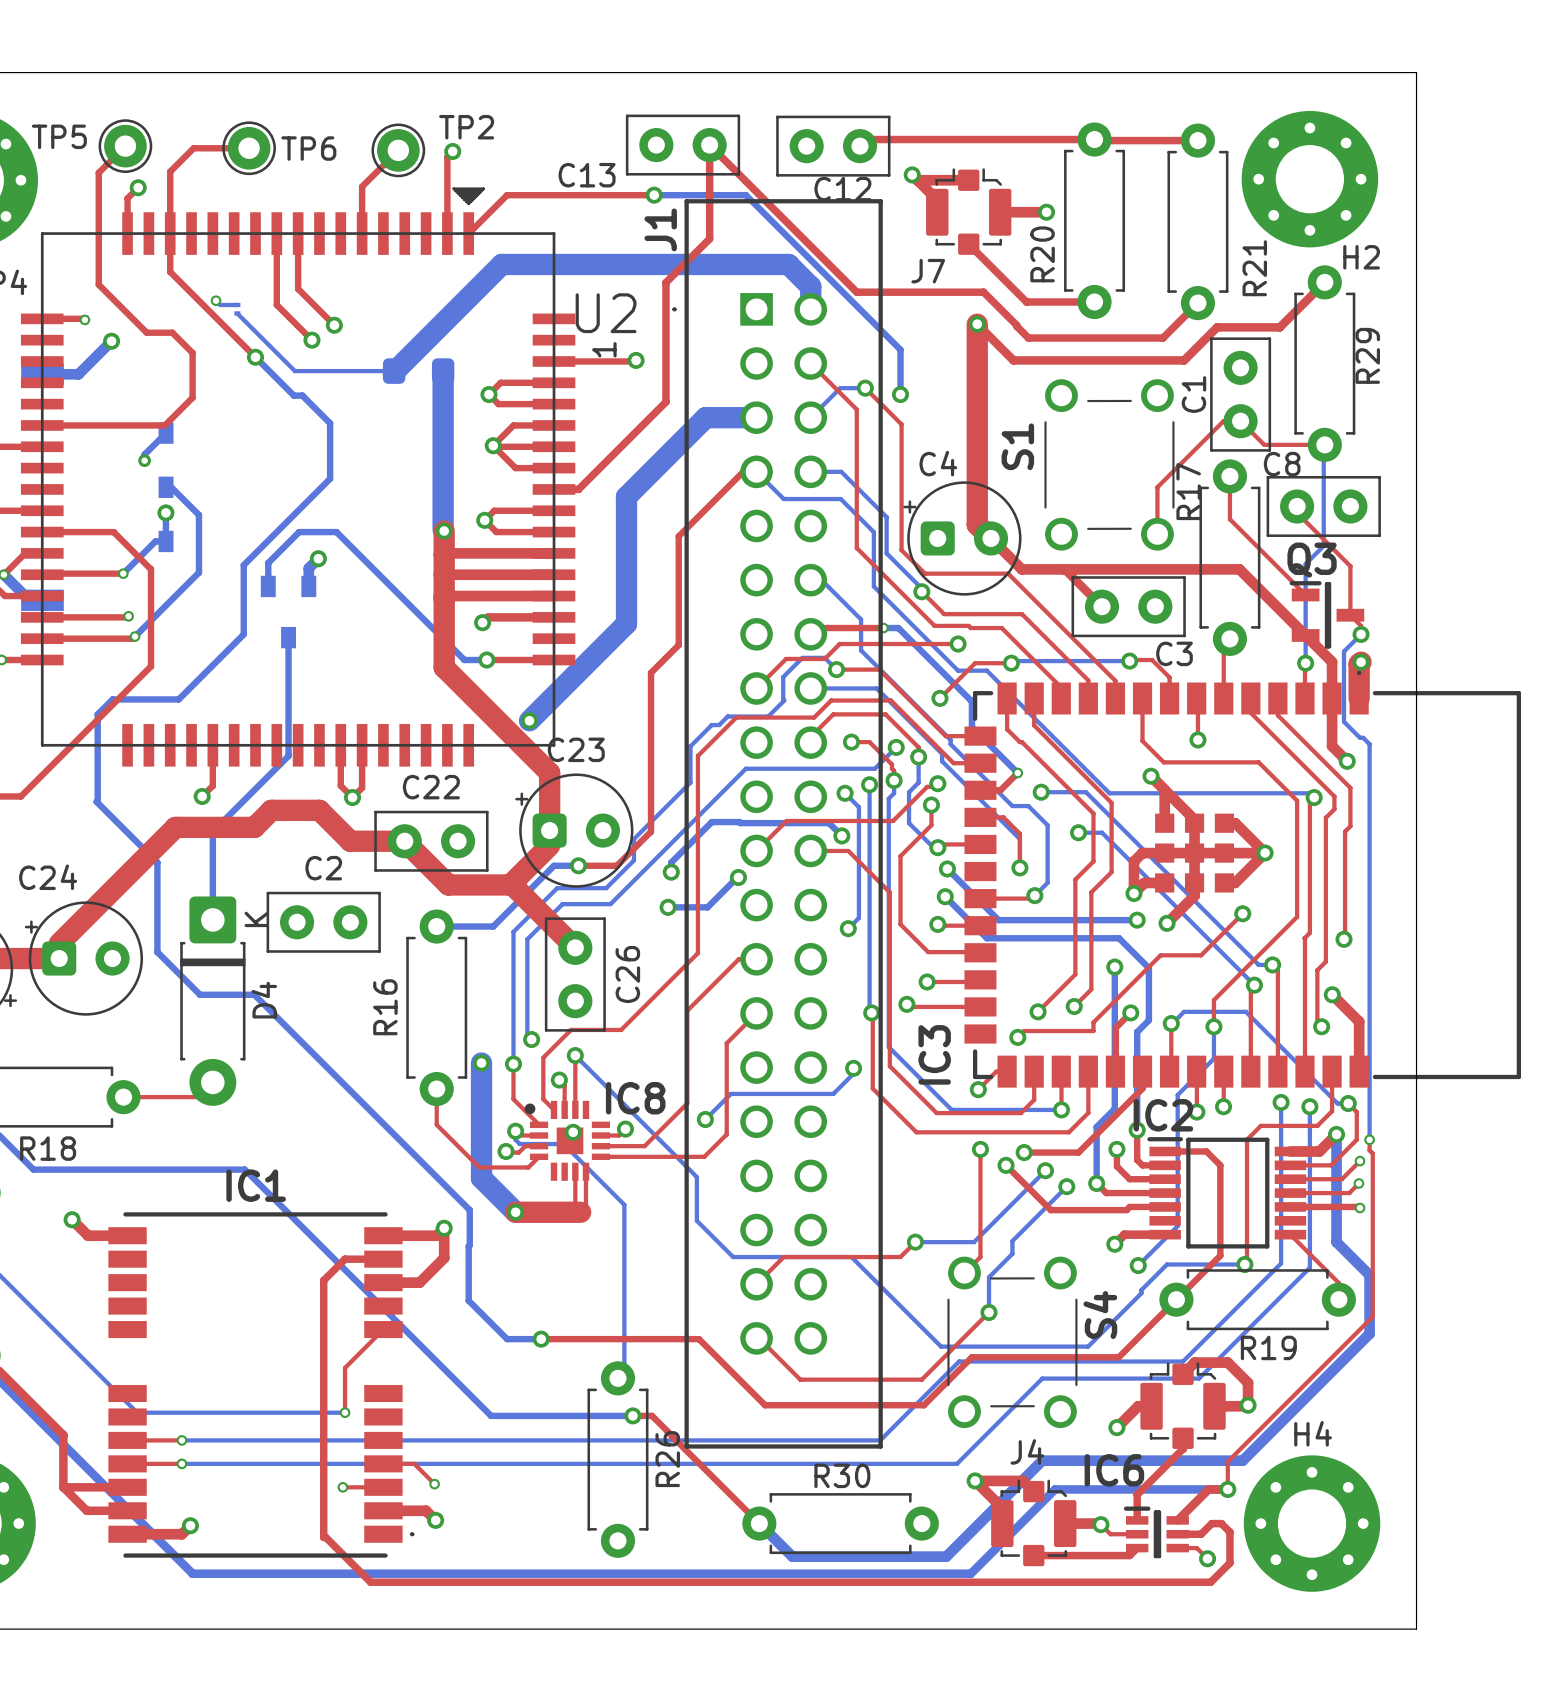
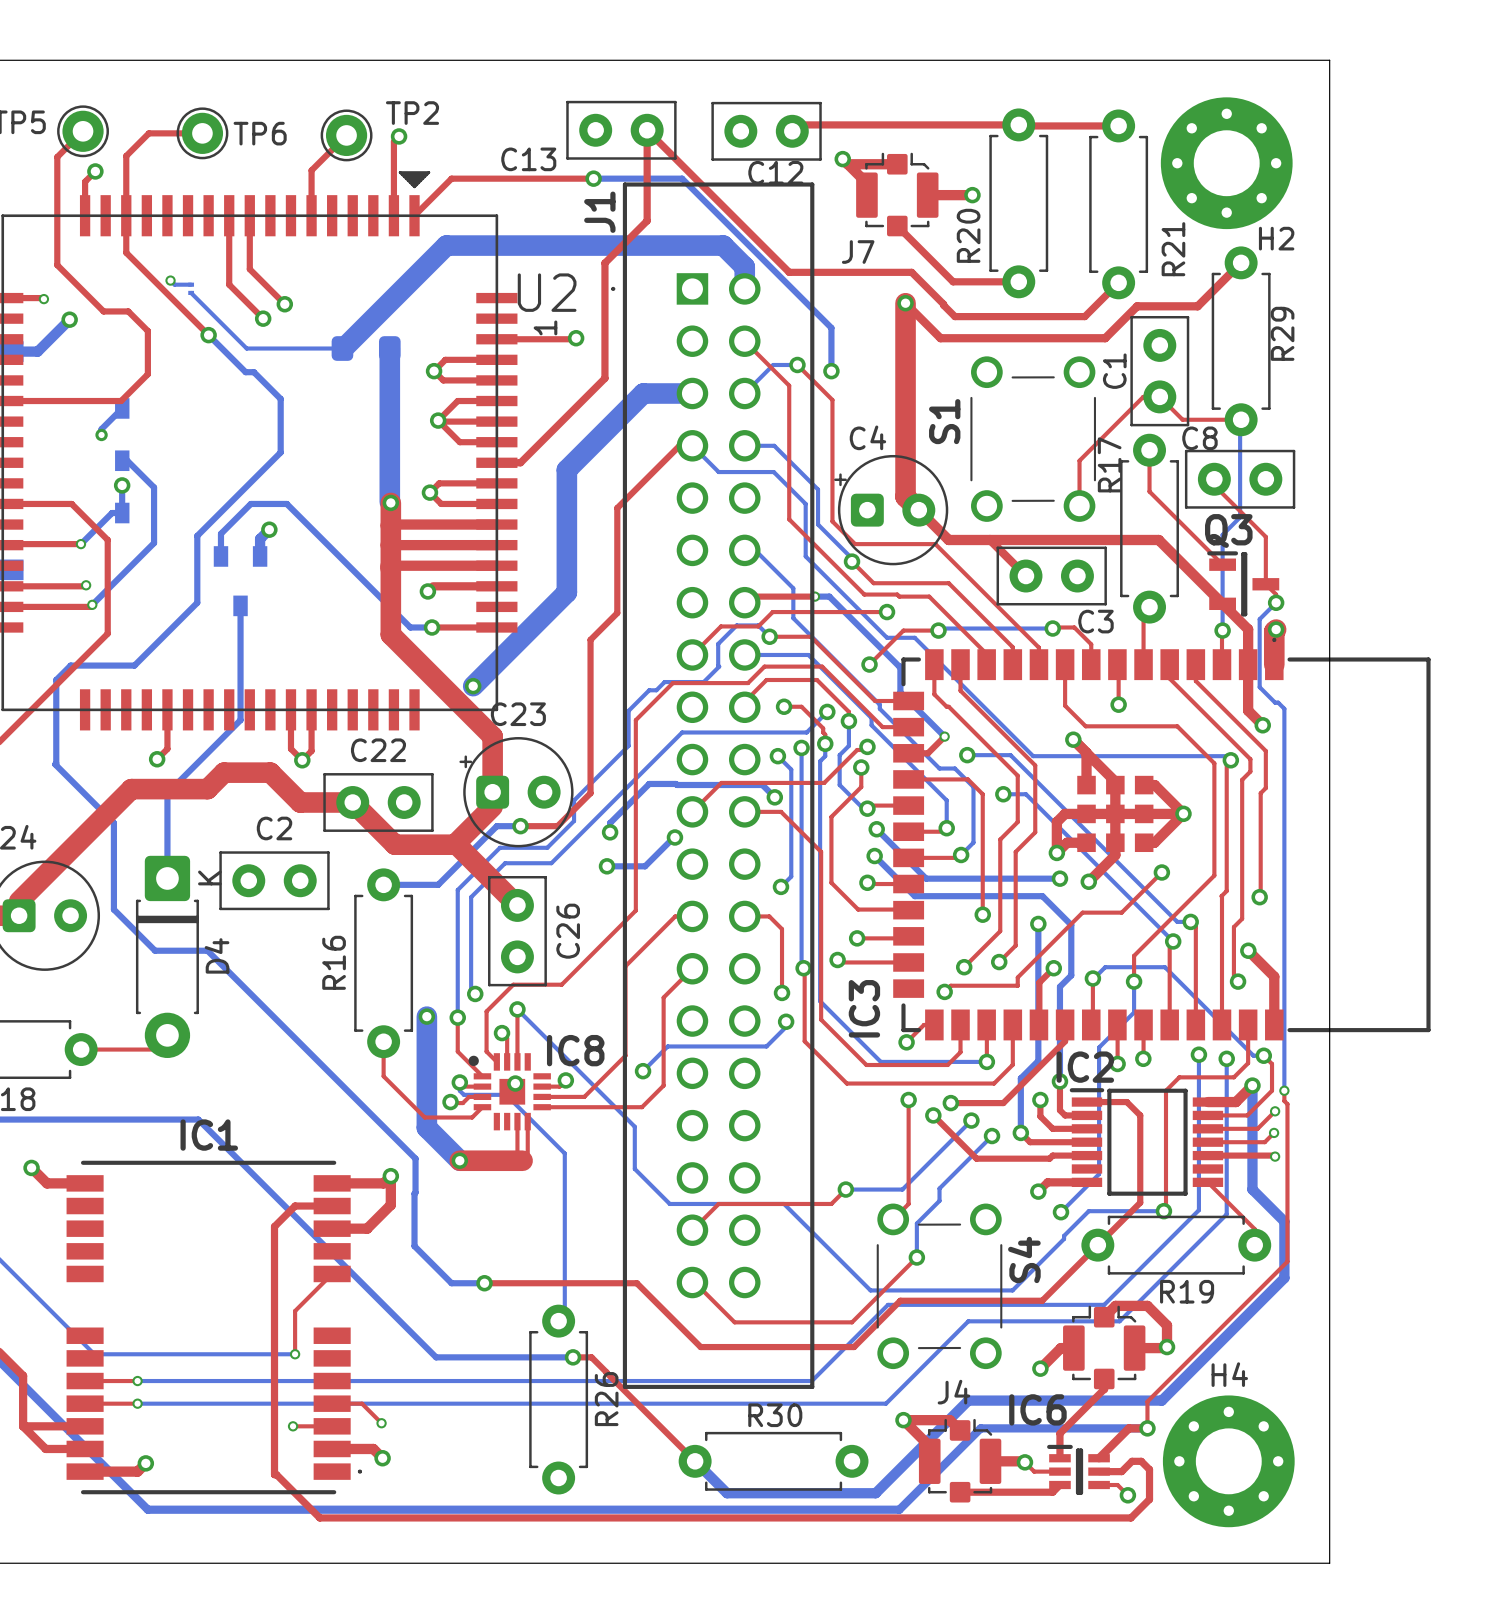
top track: (1003, 817) (1019, 833) (1019, 867) -> (930, 779) (967, 779) (982, 794) (982, 914)
top track: none -> (908, 831) (943, 831)
via: none -> (982, 914)
top track: none -> (744, 916) (769, 916) (782, 929) (782, 992)
via: none -> (782, 992)

